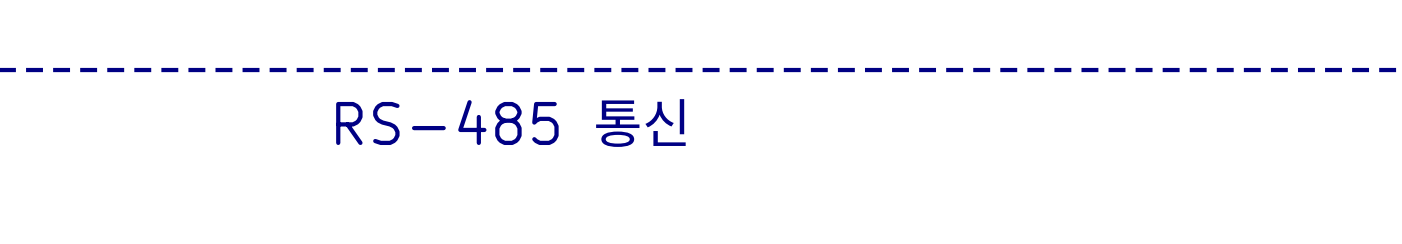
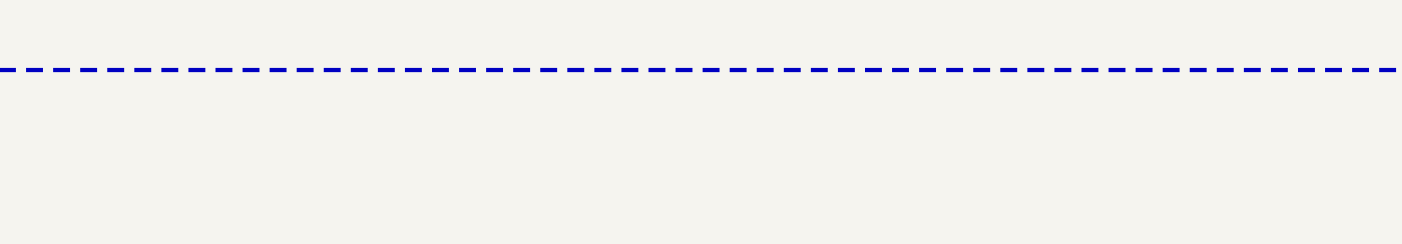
text: RS-485 통신 (511, 123) -> none

